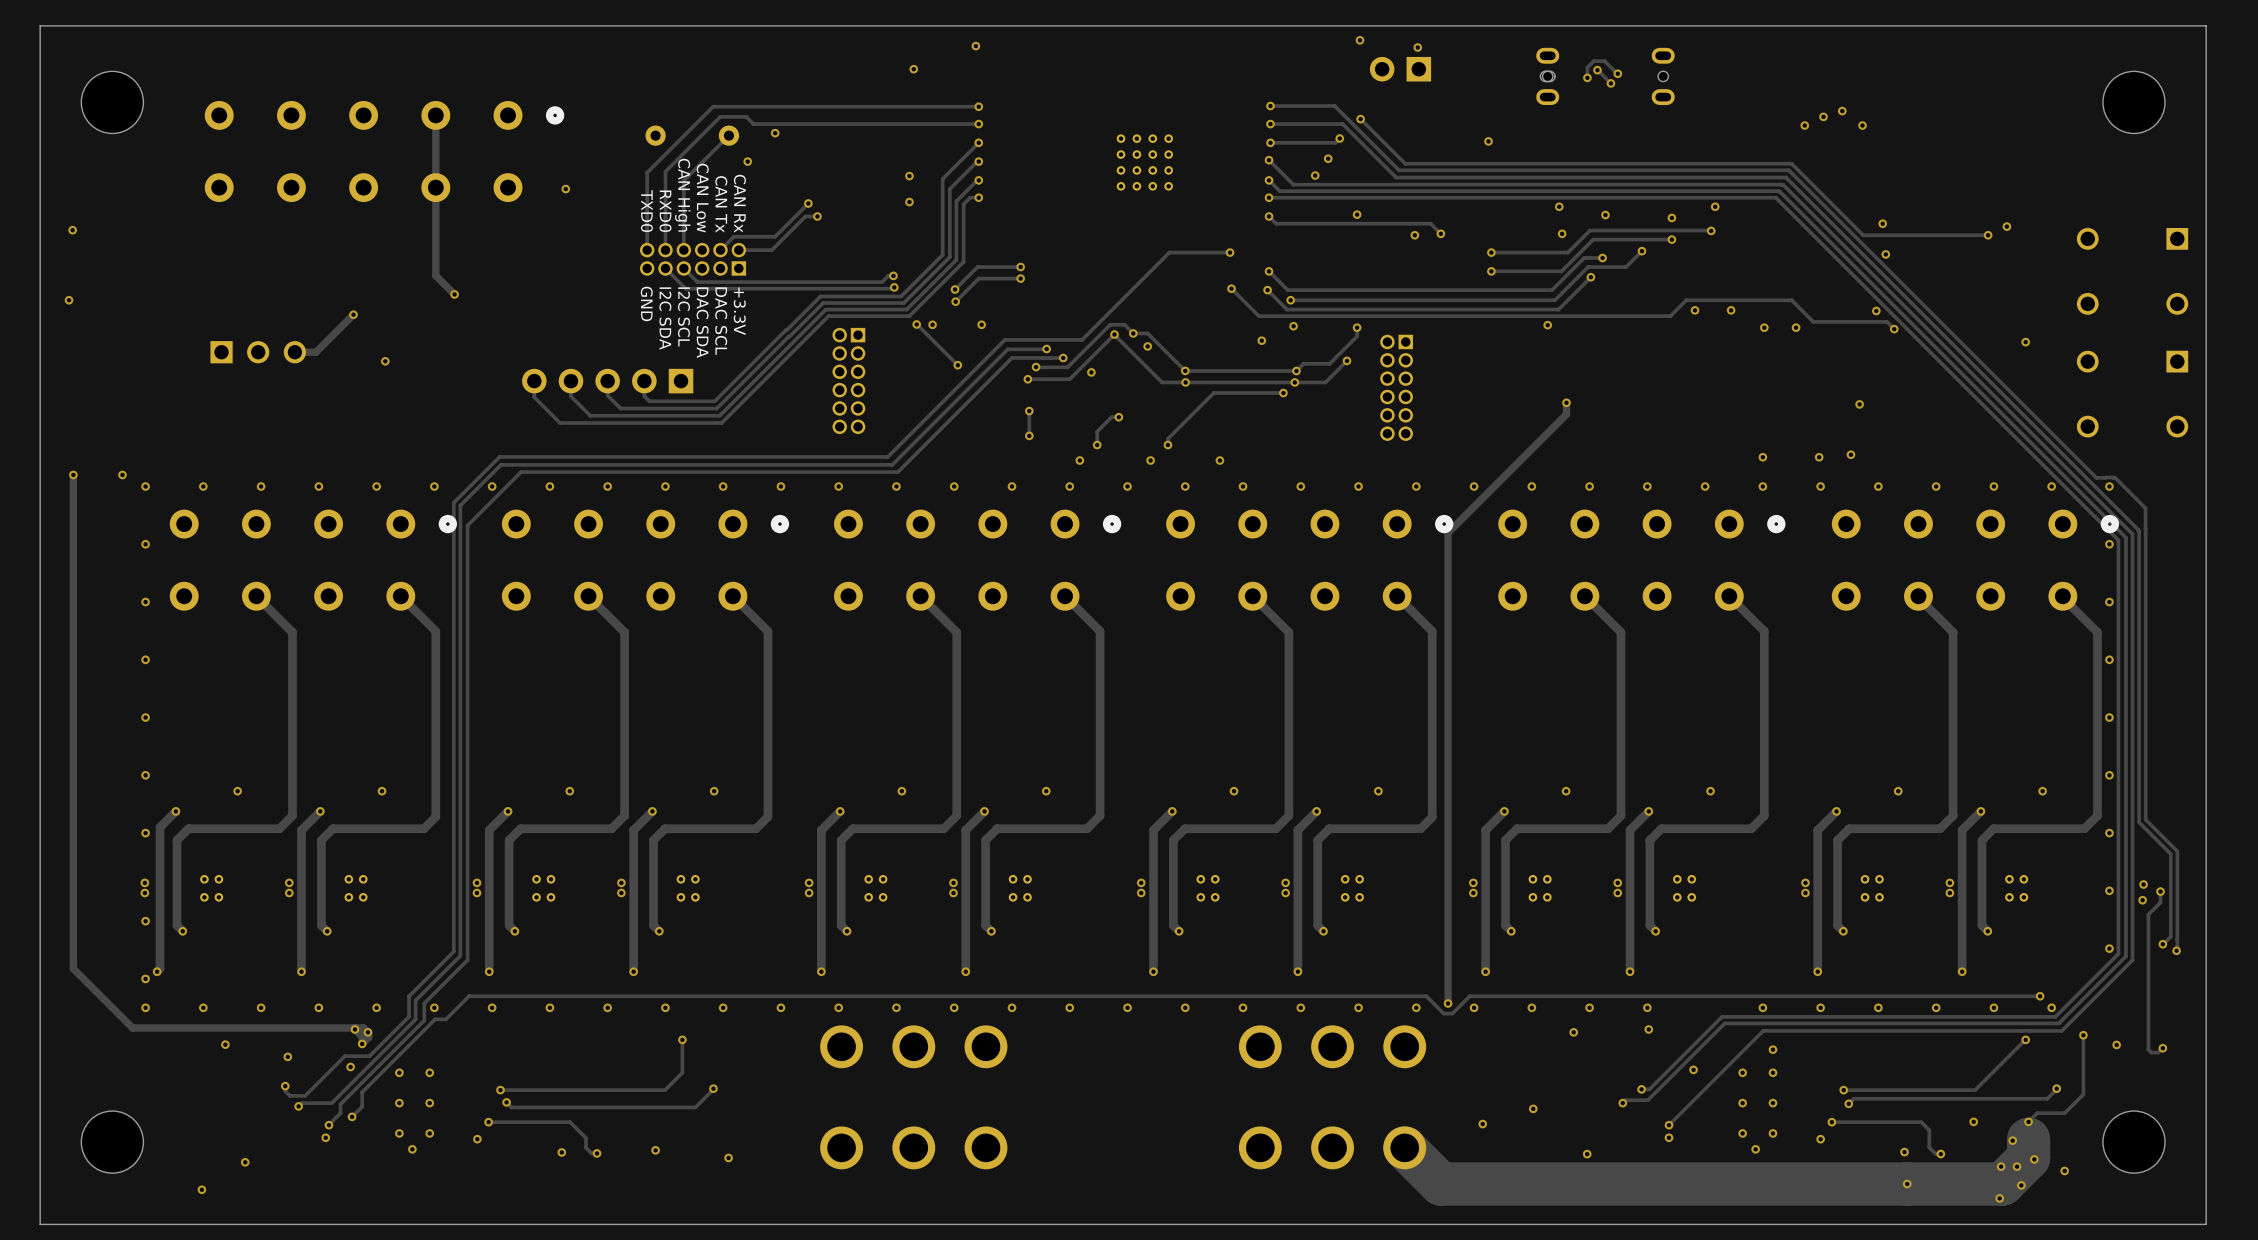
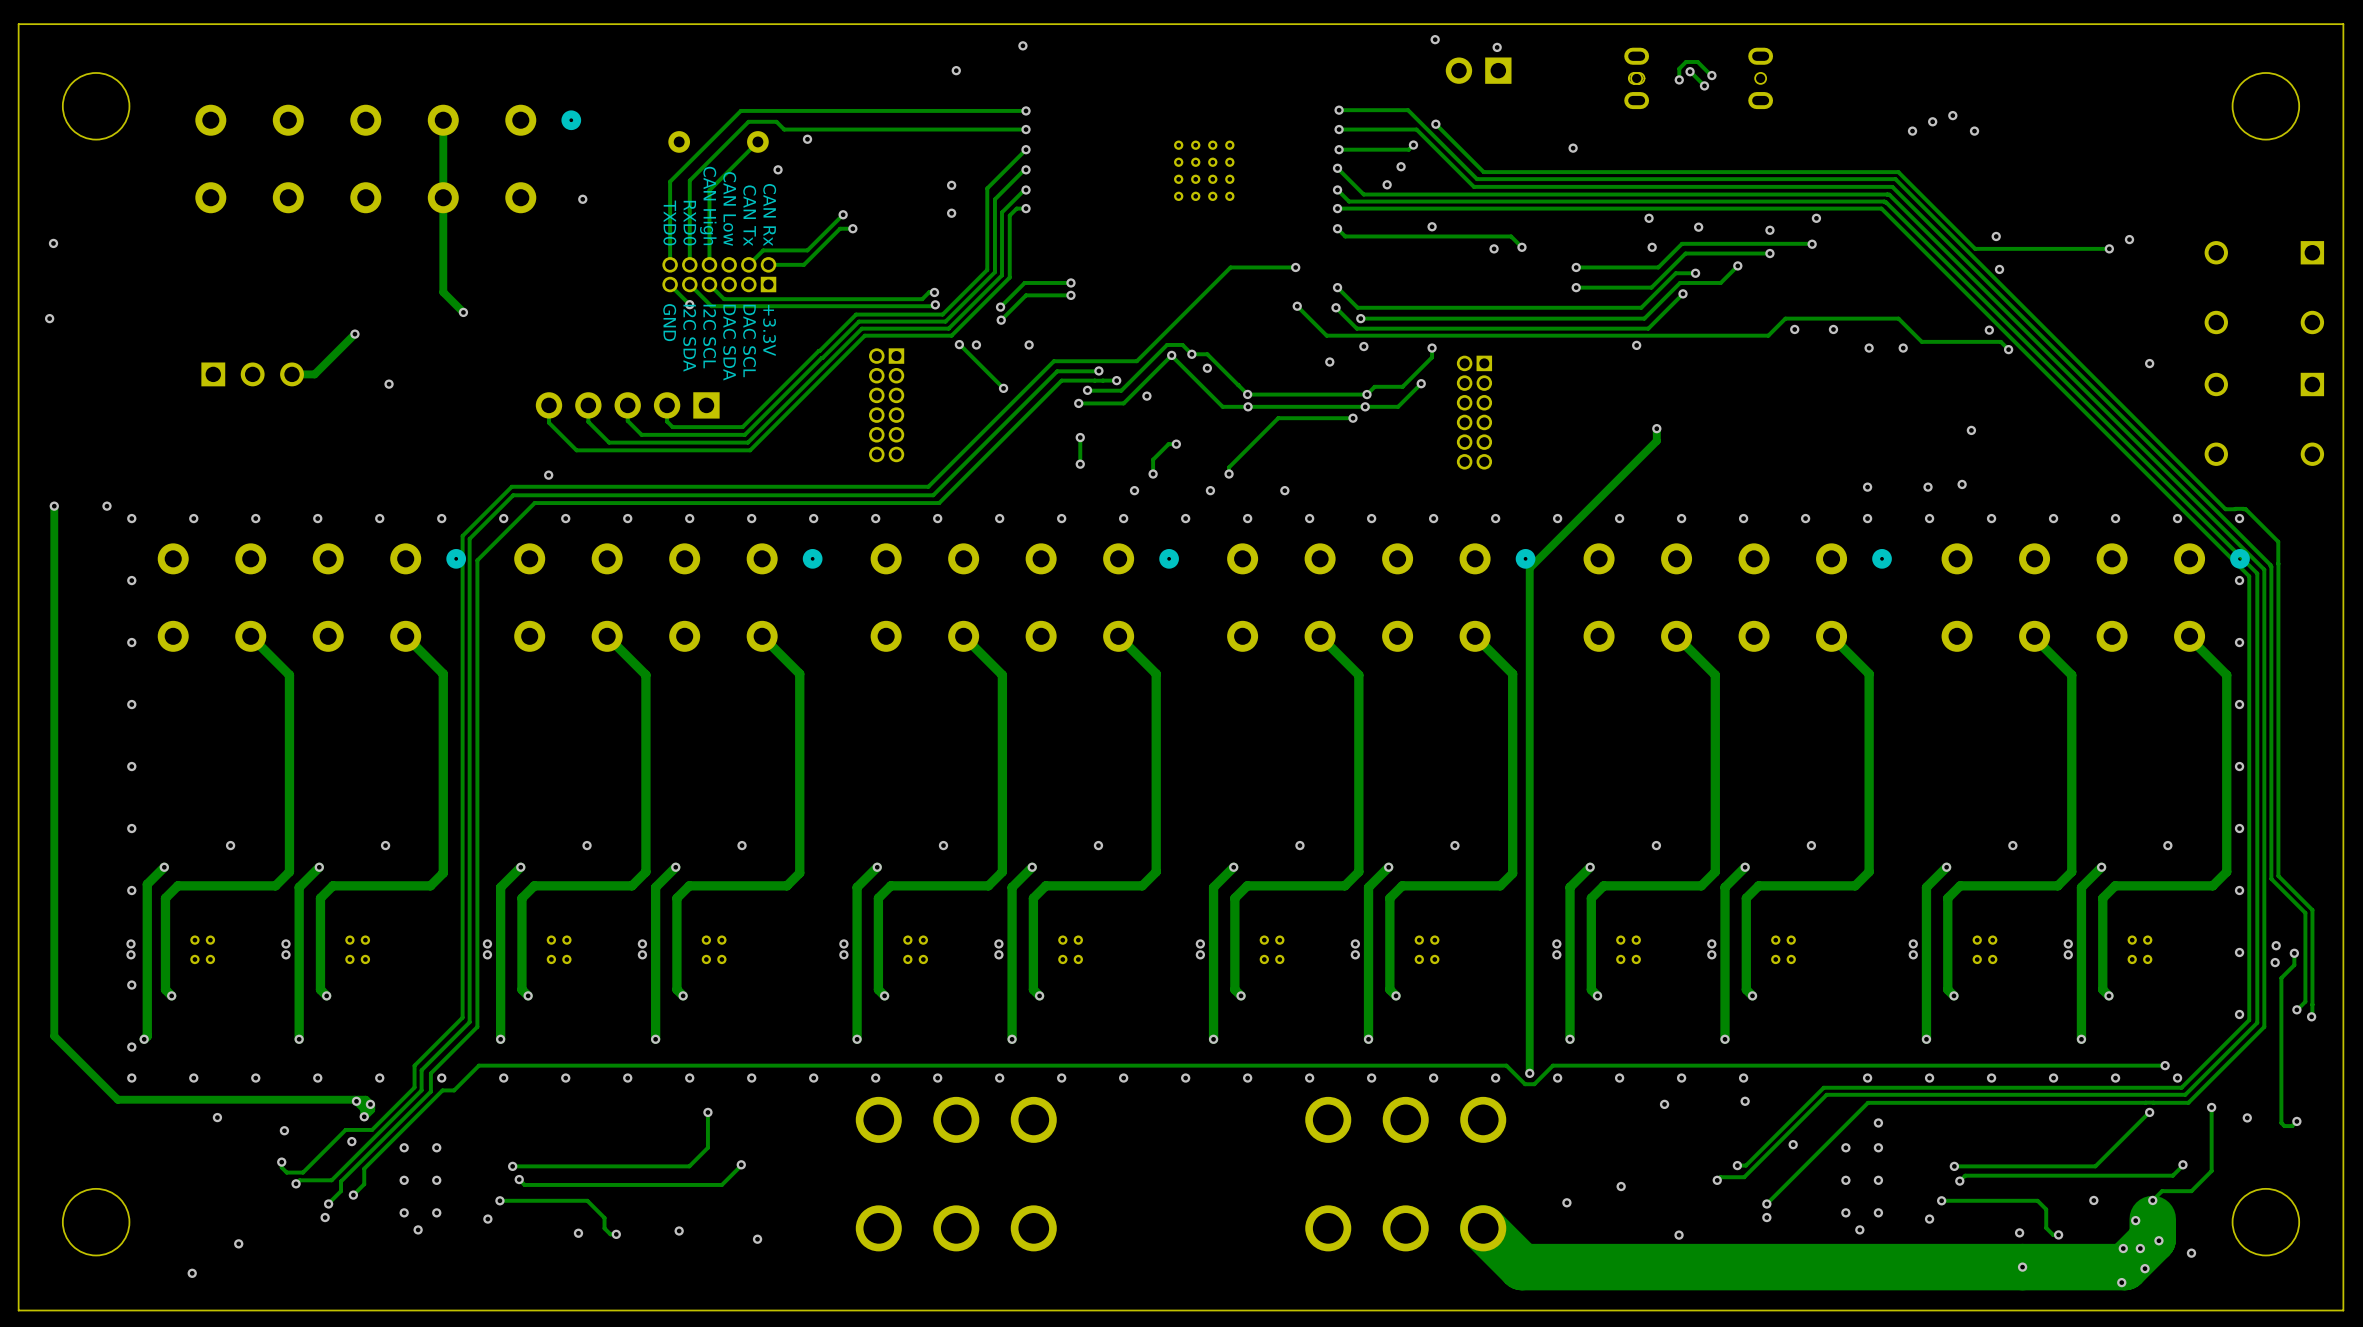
track: none -> (670, 285) (689, 304)
via: none -> (689, 304)
via: none -> (548, 475)

